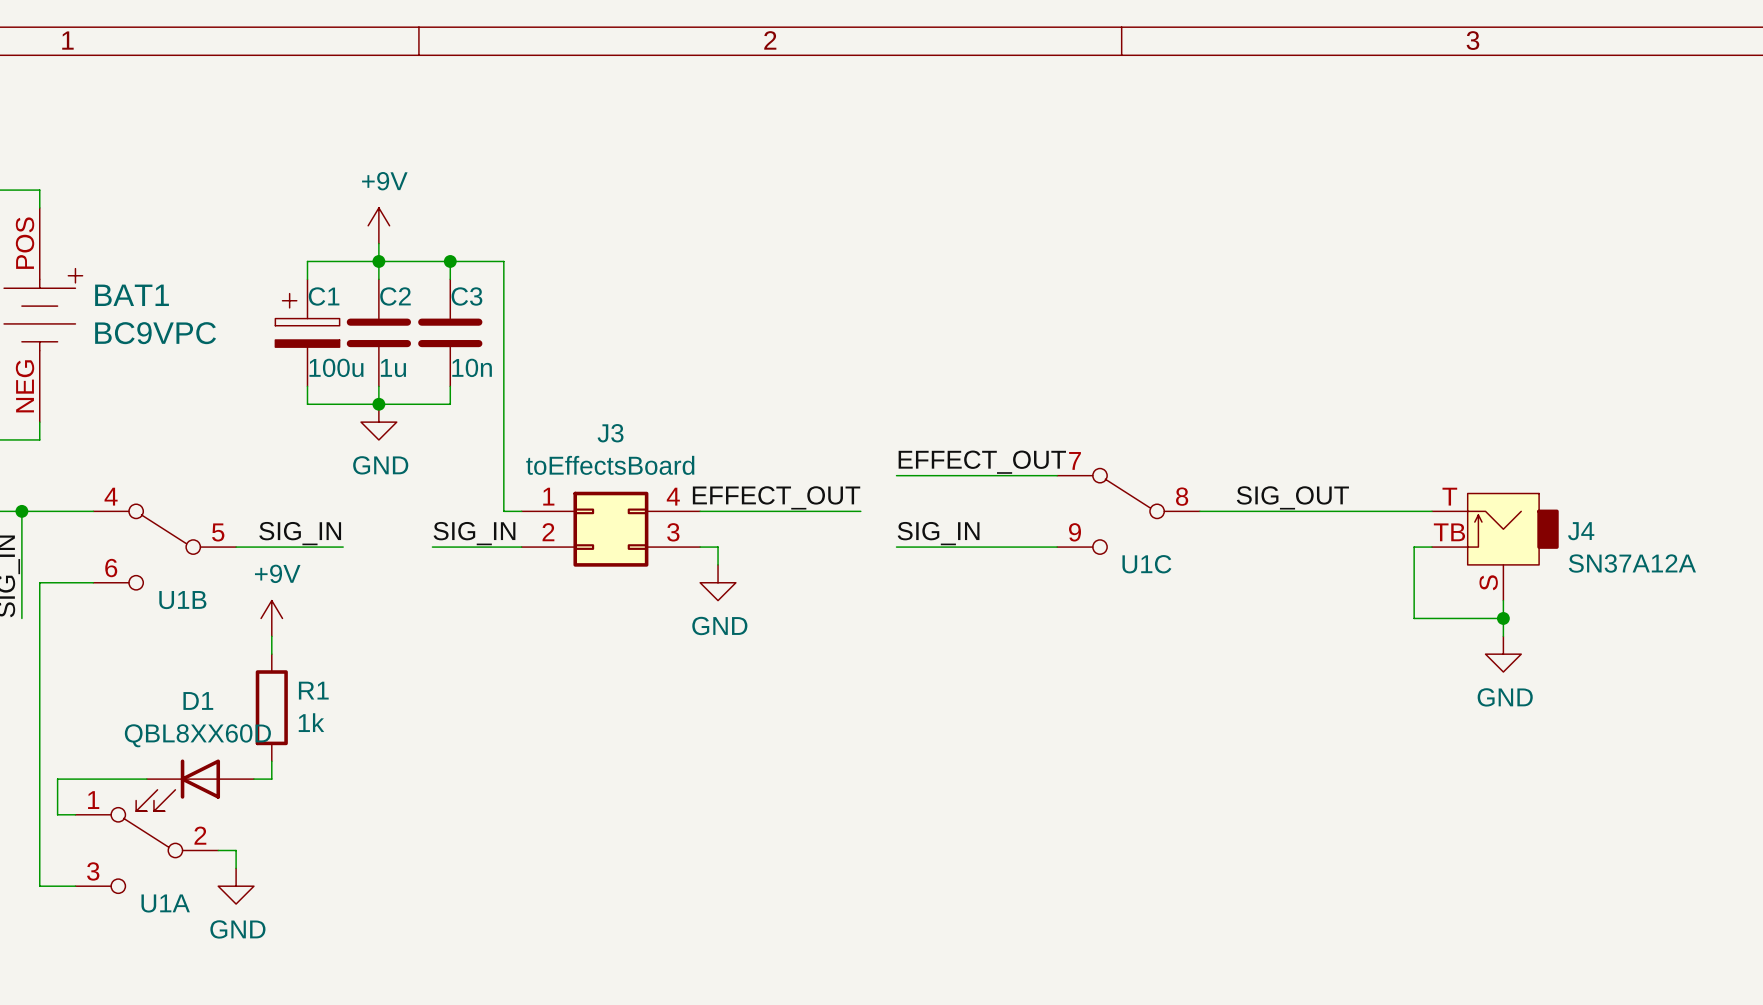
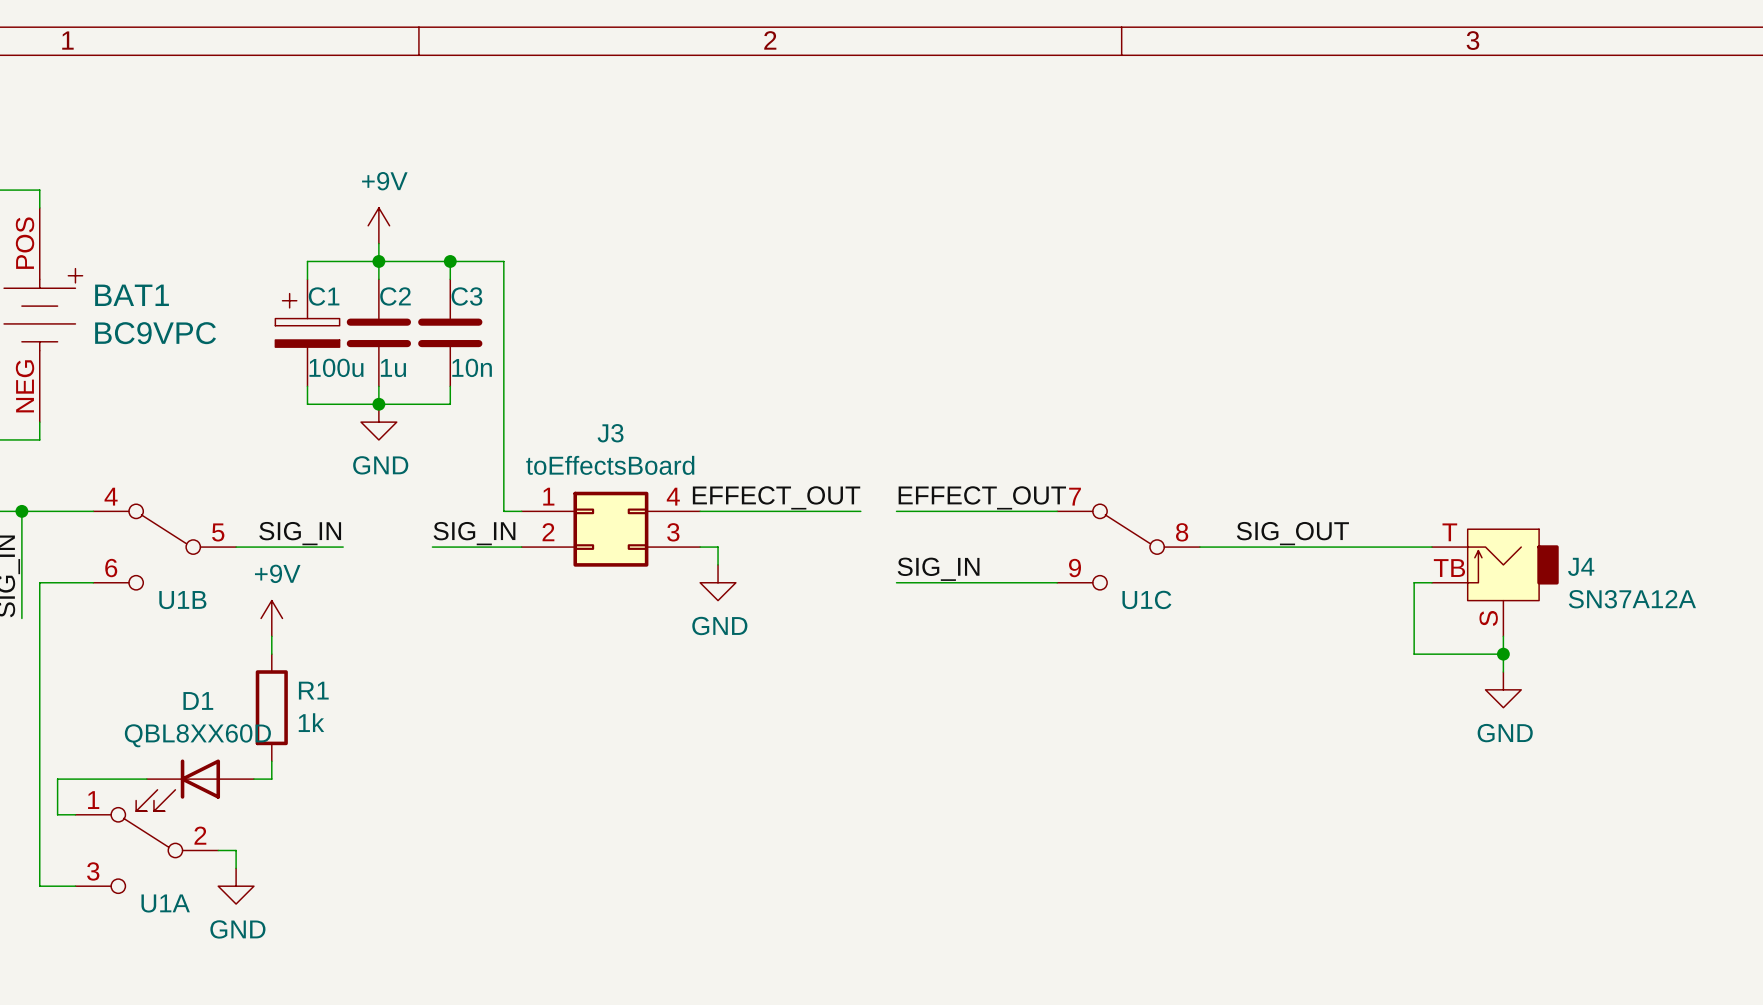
label position: EFFECT_OUT (982, 462) -> EFFECT_OUT (982, 497)
wire: (896, 475) (1057, 475) -> (896, 511) (1057, 511)
label position: SIG_OUT (1292, 497) -> SIG_OUT (1292, 533)
U1C position: (1128, 511) -> (1128, 547)
wire: (1199, 511) (1431, 511) -> none
label position: SIG_IN (938, 533) -> SIG_IN (938, 569)
wire: (896, 547) (1057, 547) -> (896, 582) (1057, 582)
wire: none -> (1199, 547) (1414, 547)
wire: (1414, 547) (1414, 582) -> (1431, 582) (1414, 582)
J4 position: (1495, 547) -> (1495, 582)
wire: (1414, 618) (1503, 618) -> (1414, 618) (1414, 654) (1503, 654)
junction position: (1503, 618) -> (1503, 654)
power symbol position: GND (1503, 654) -> GND (1503, 689)

